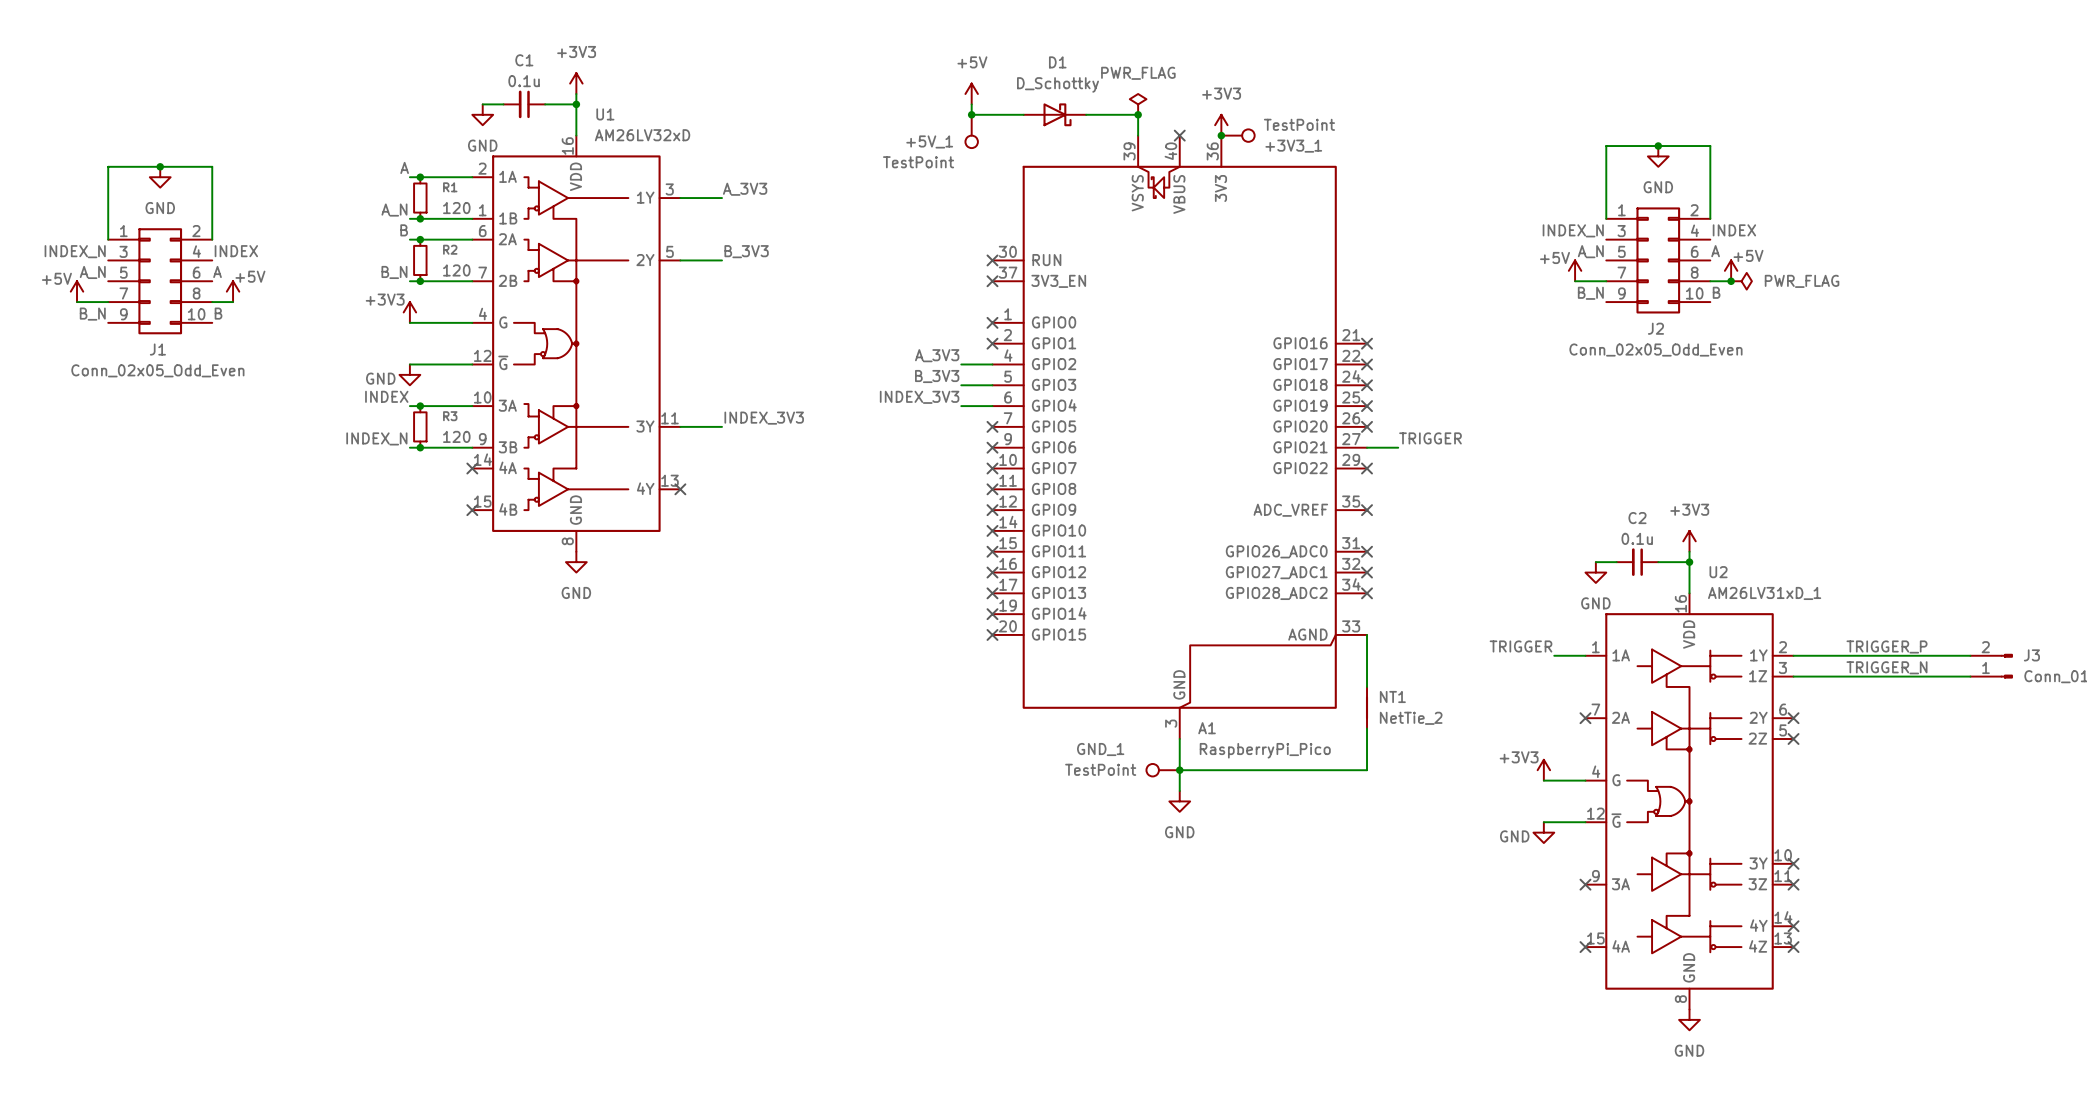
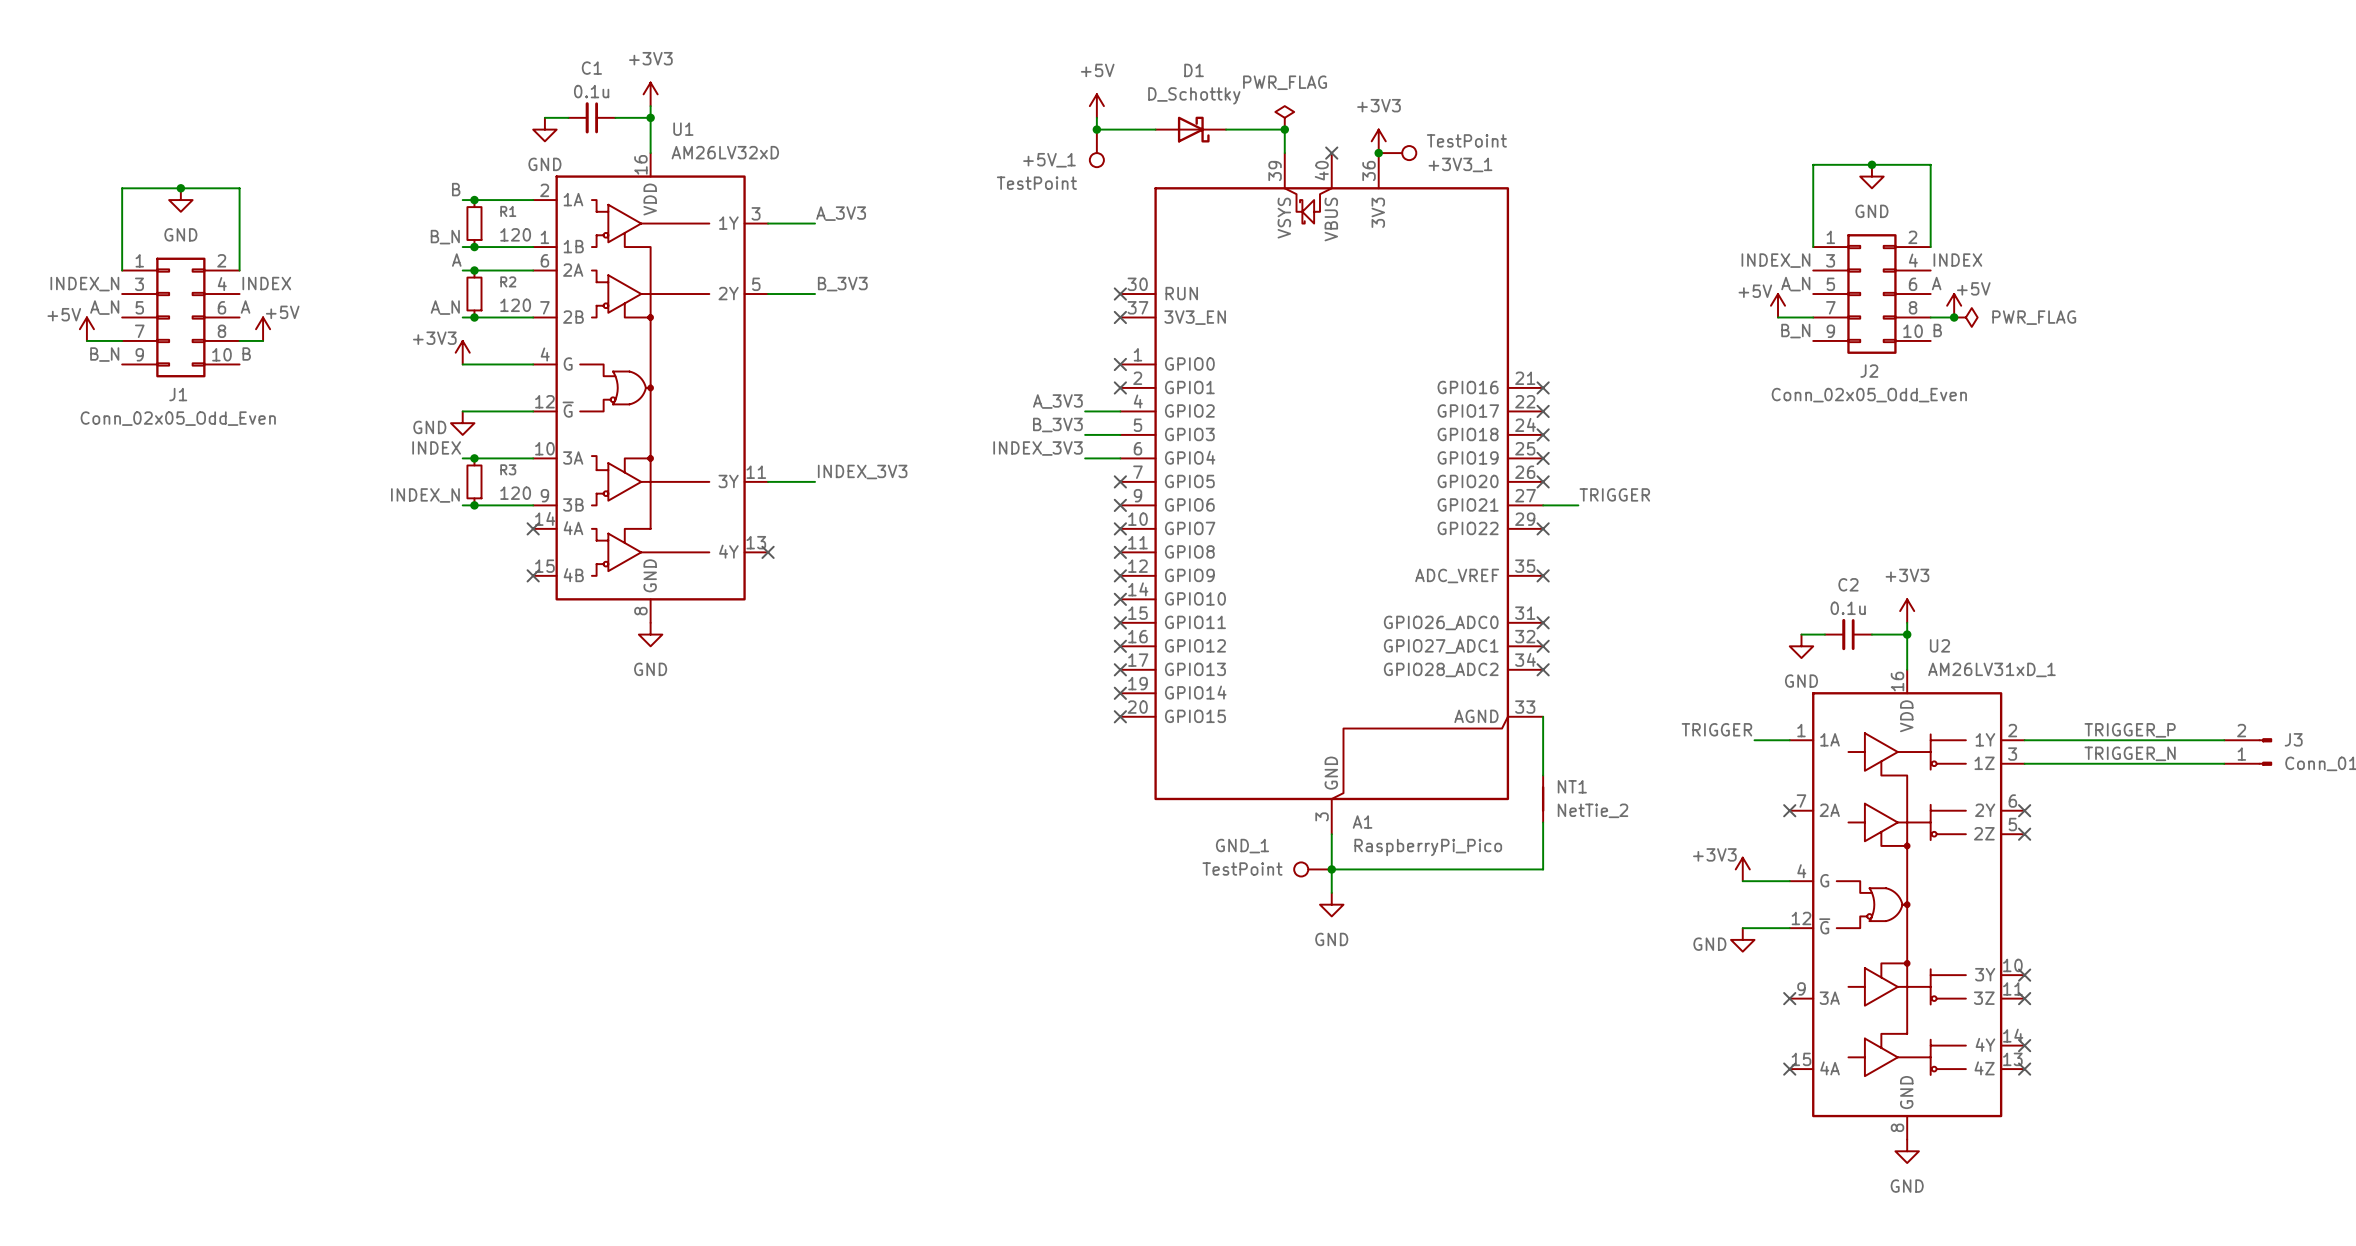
label: A (404, 167) -> B (456, 189)
label: A_N (394, 210) -> B_N (445, 237)
label: B (404, 230) -> A (456, 260)
label: B_N (394, 272) -> A_N (445, 307)

